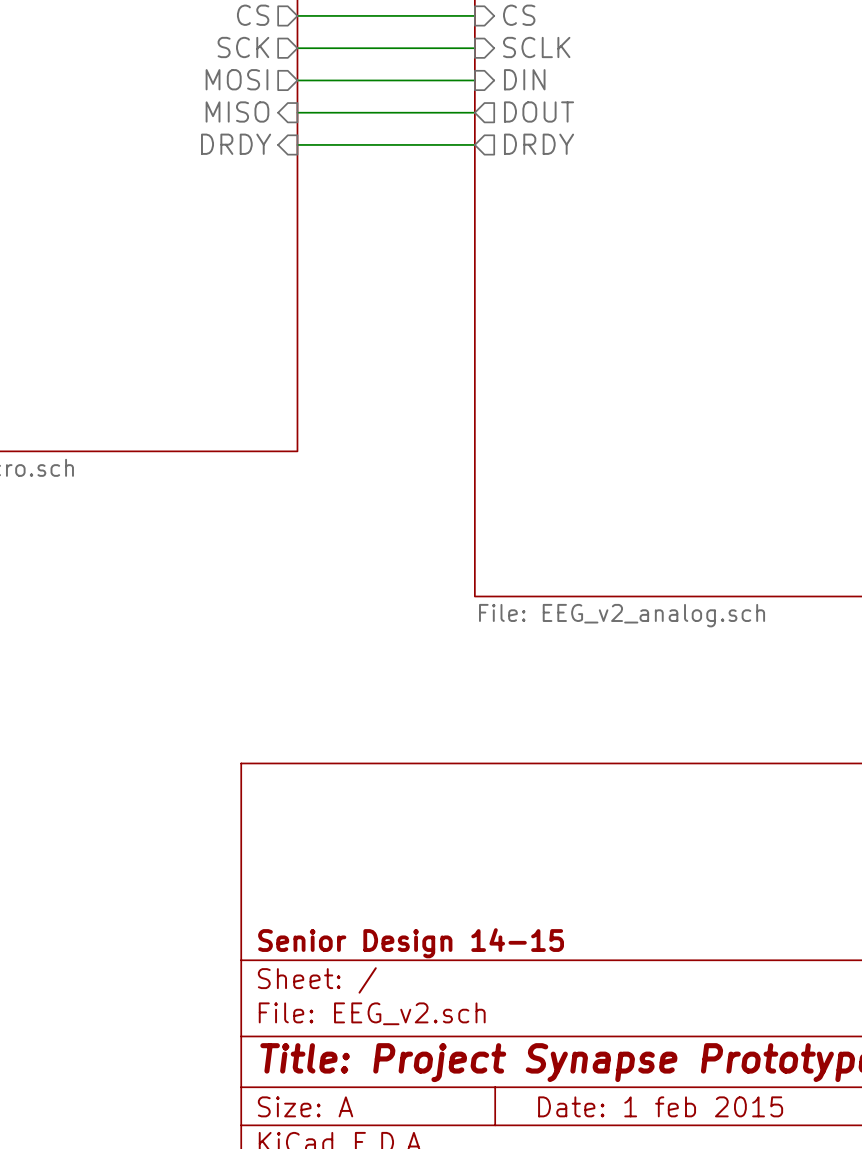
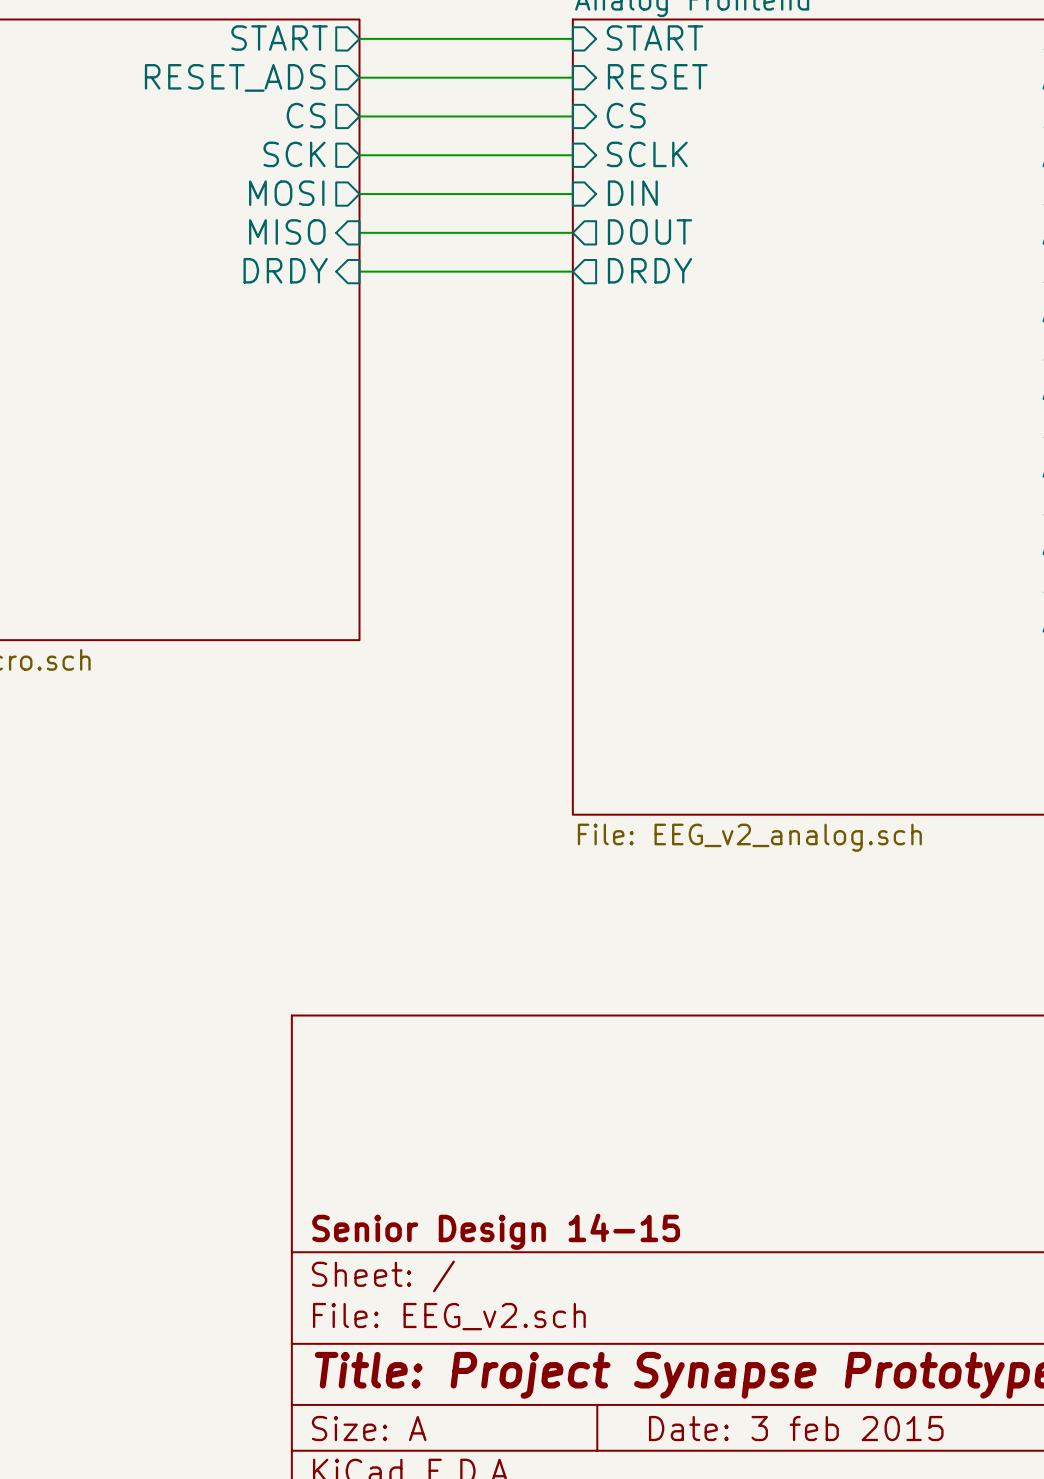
title block: Date: 1 feb 2015 (660, 1106) -> Date: 3 feb 2015 (796, 1428)

